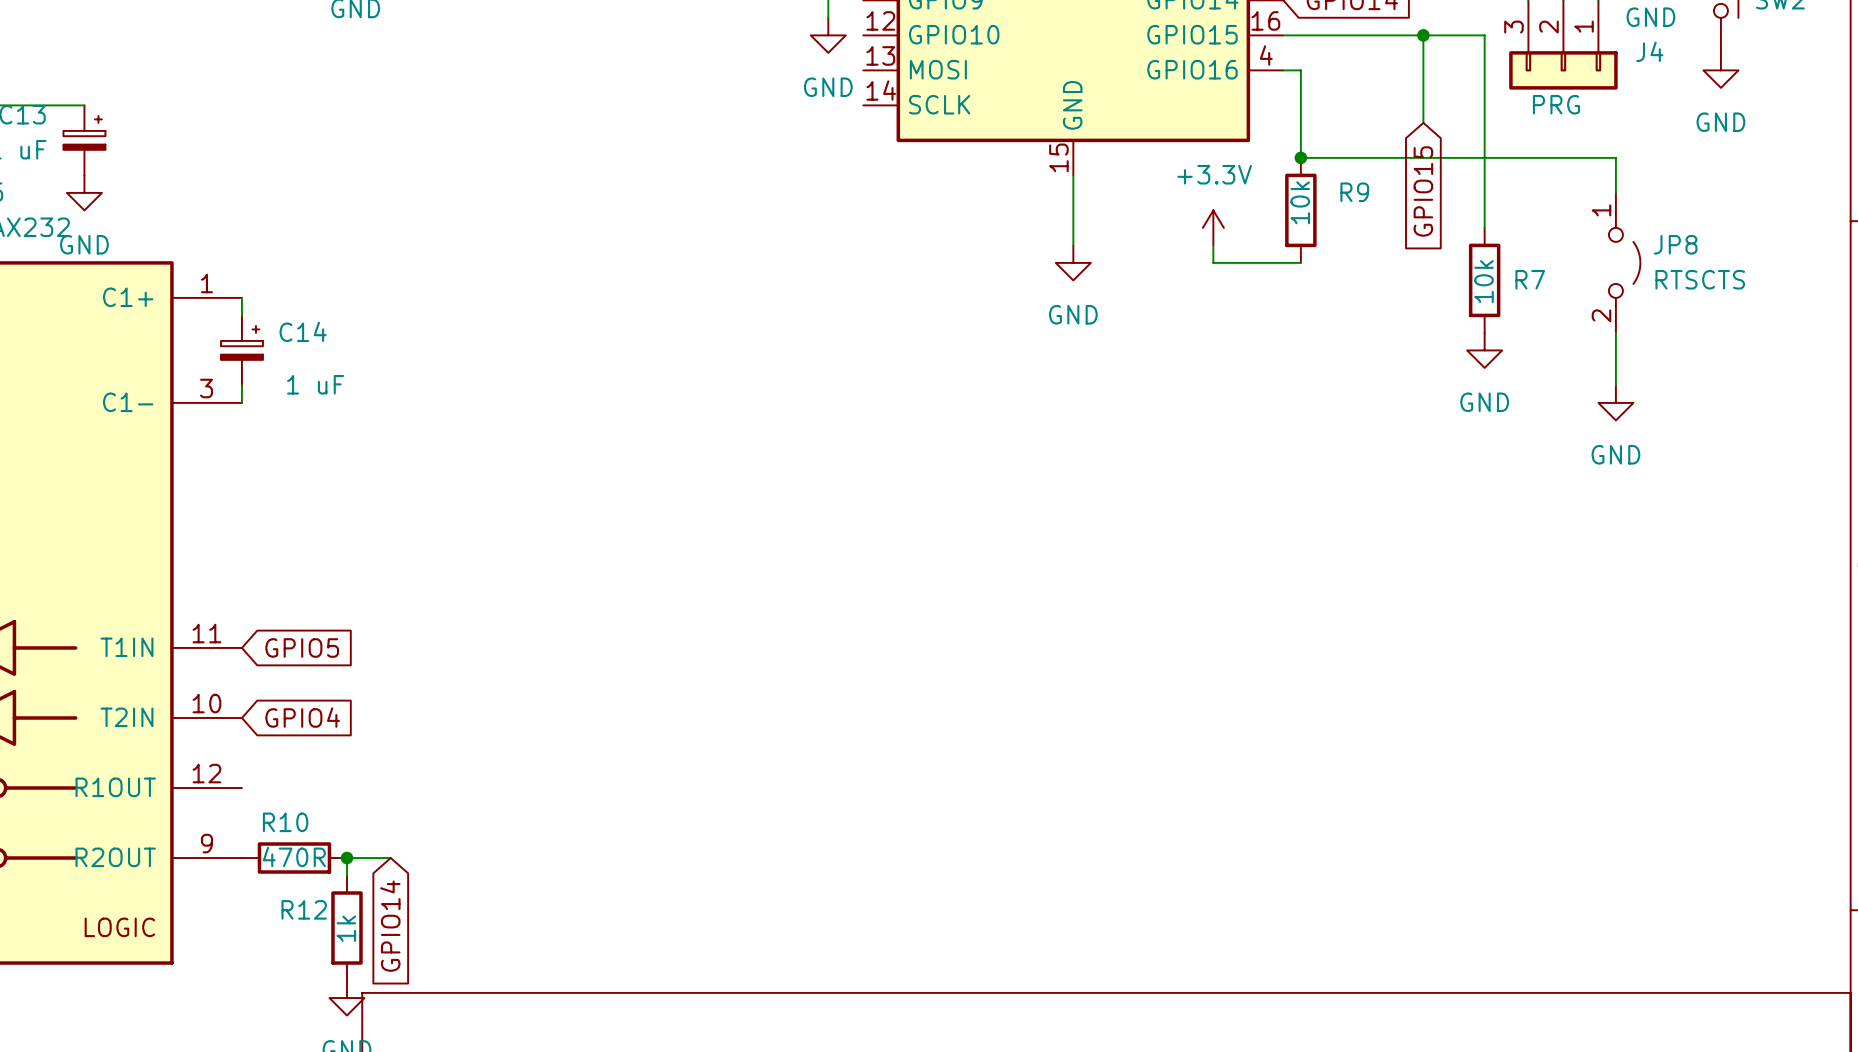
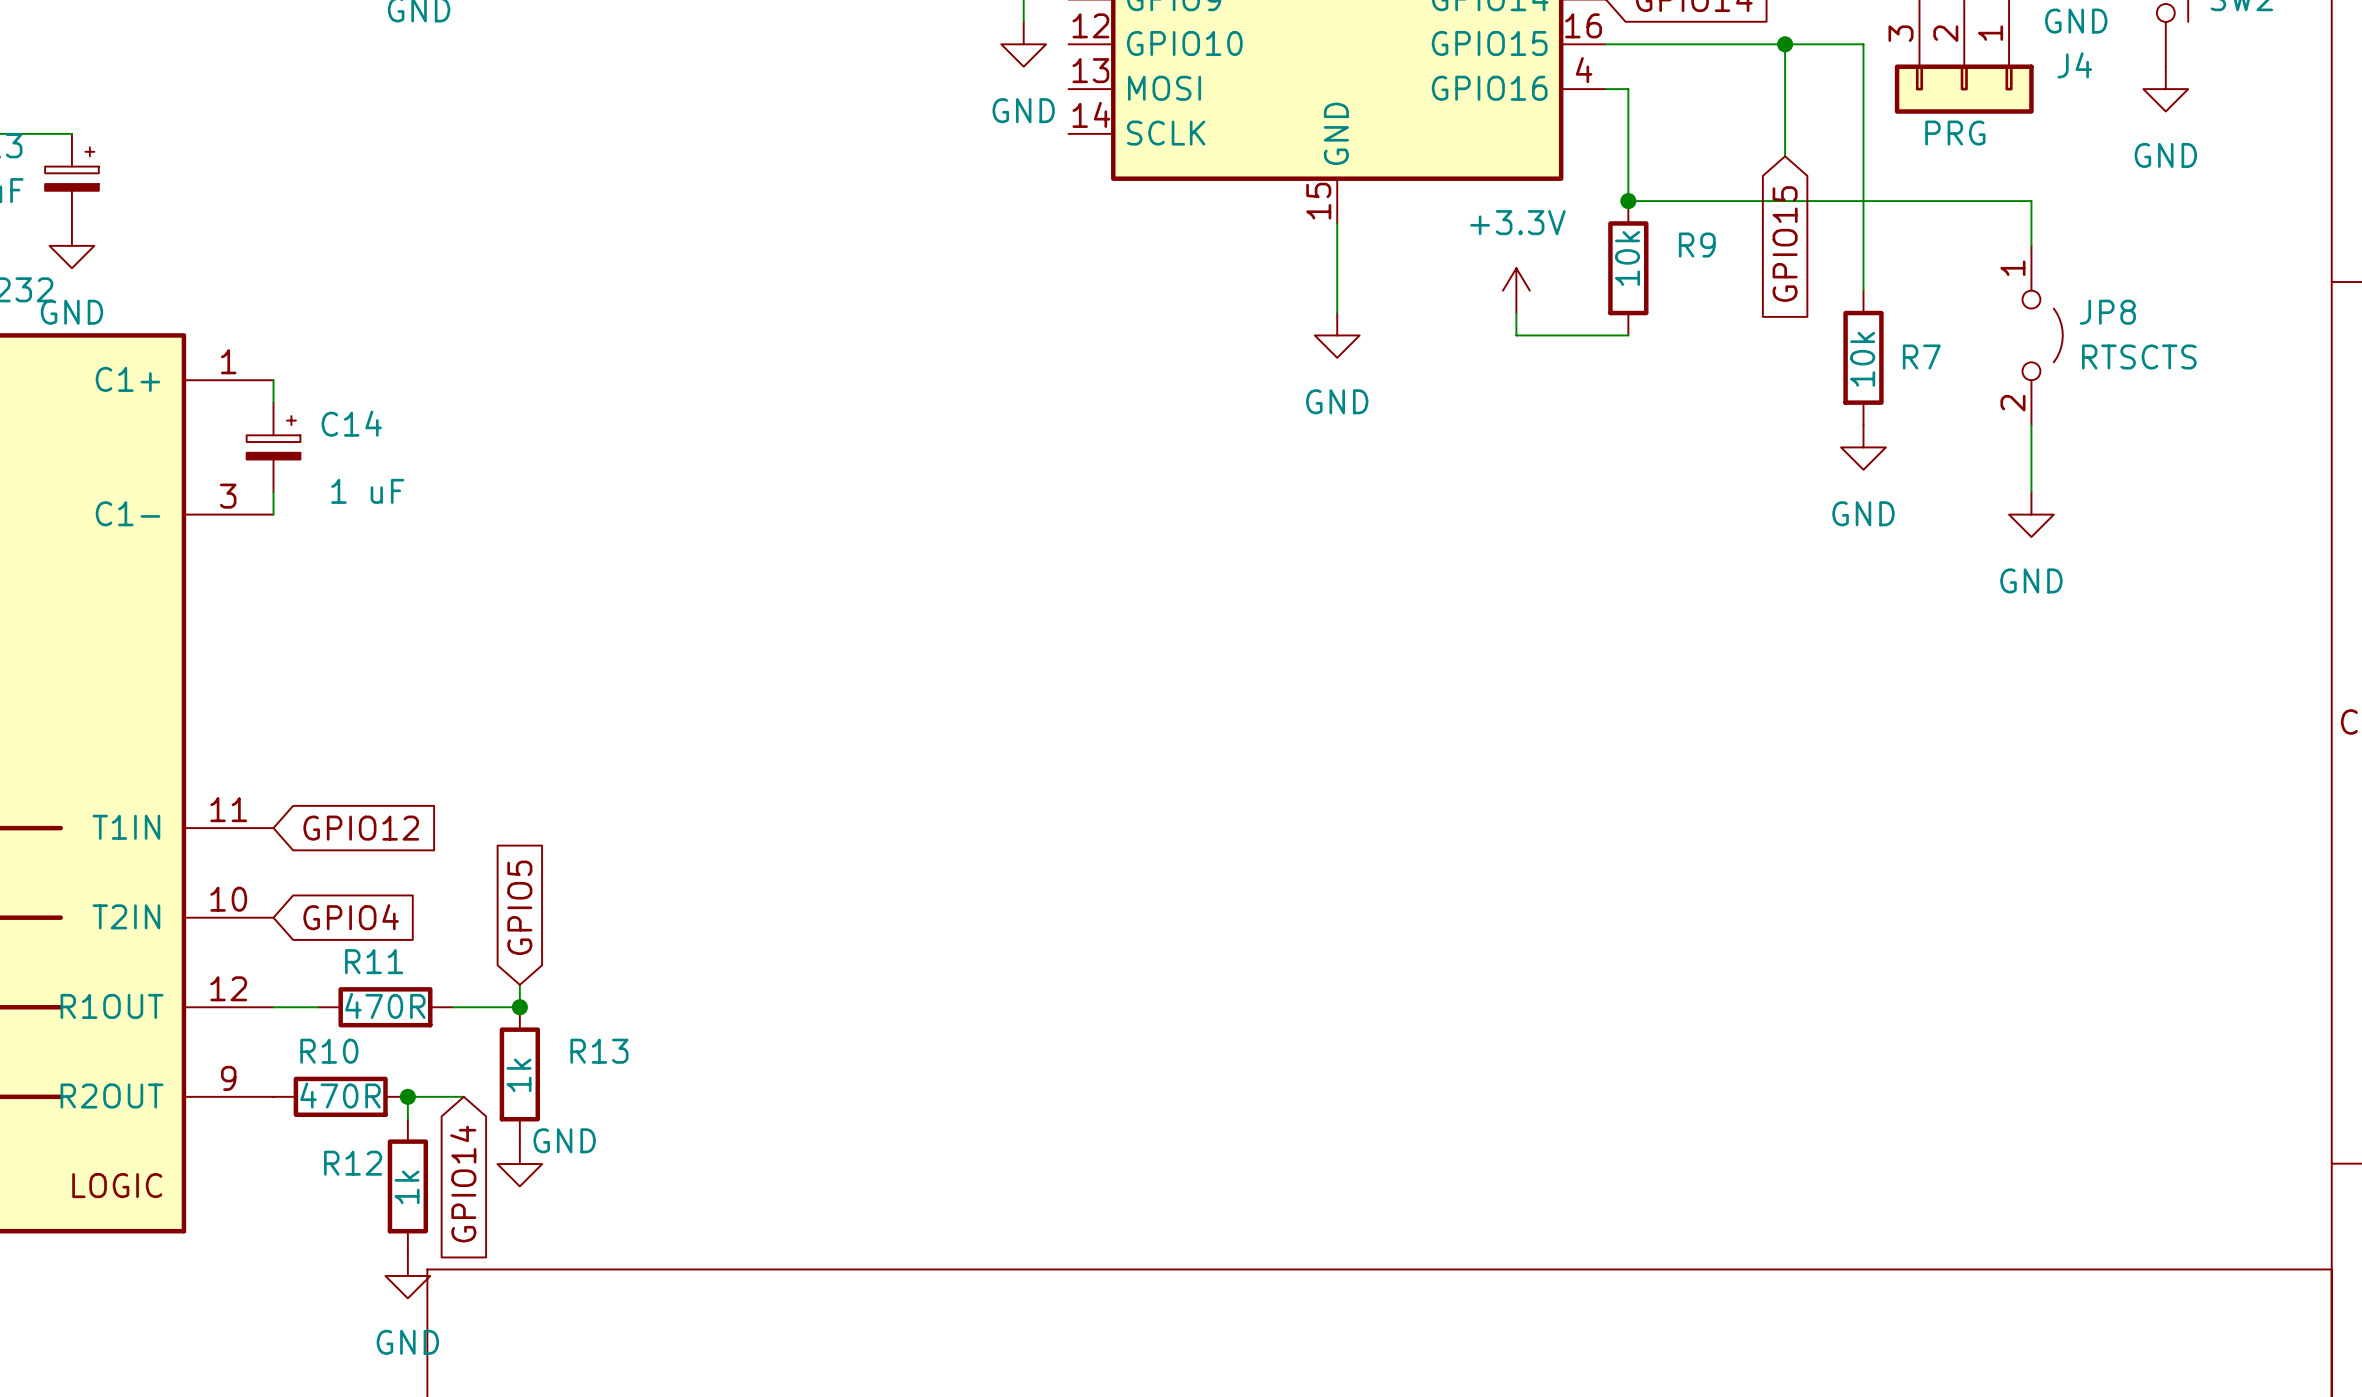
global label: GPIO5 (302, 647) -> GPIO12 (361, 828)
global label: none -> GPIO5 (519, 907)
wire: none -> (519, 984) (519, 1007) (452, 1007)
wire: none -> (273, 1007) (318, 1007)
R11: none -> 470R (385, 1007)
junction: none -> (519, 1007)
R13: none -> 1k (519, 1074)
power symbol: none -> GND (519, 1164)

